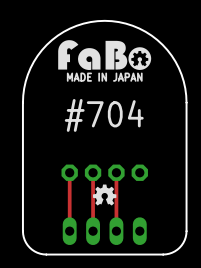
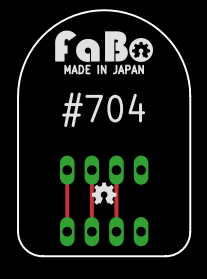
part footprint: [61, 164, 148, 181] -> [59, 155, 149, 185]

